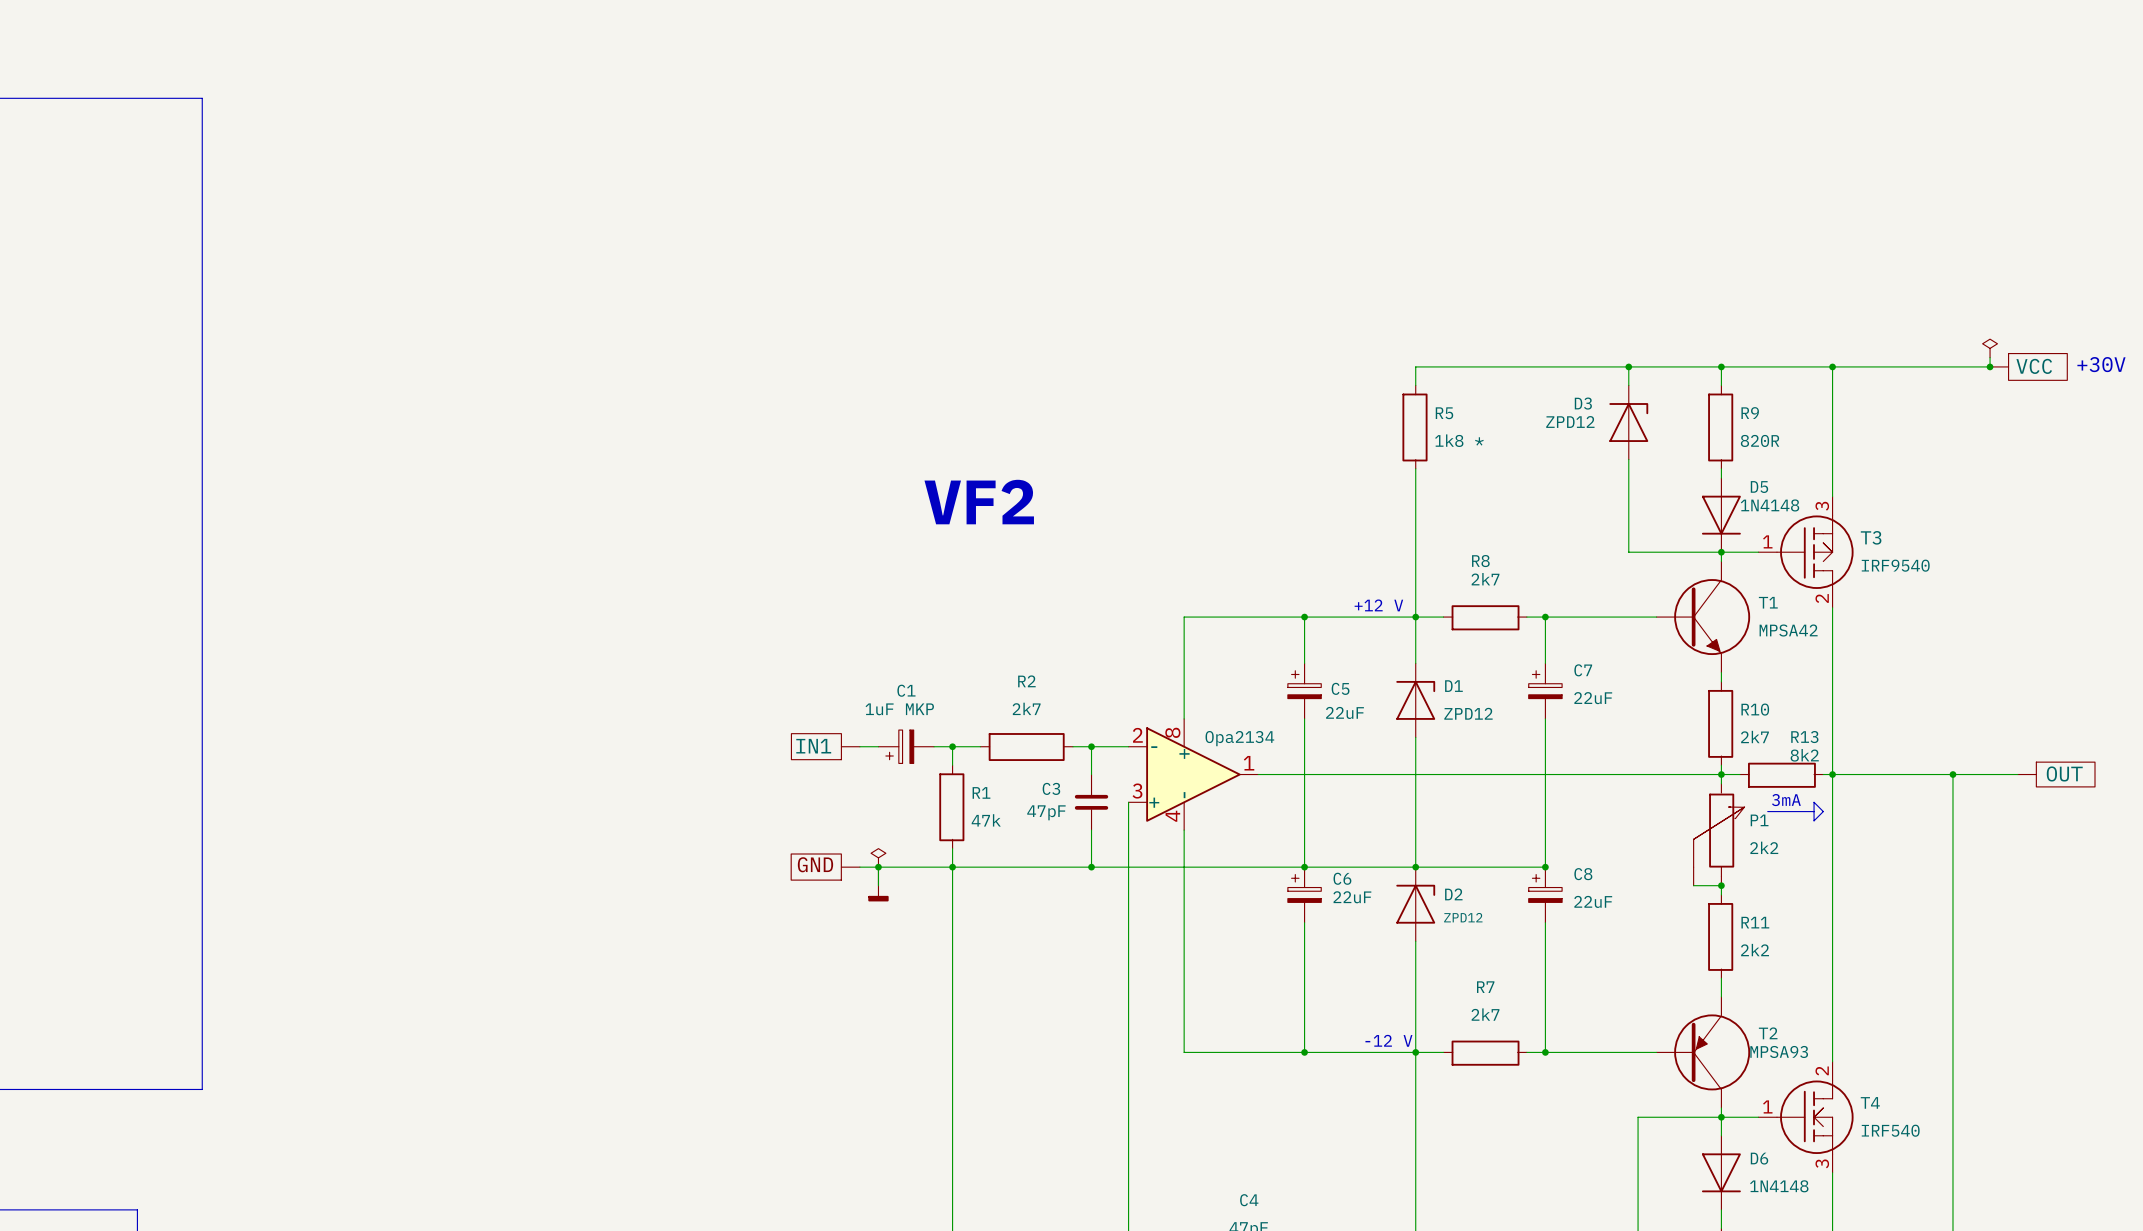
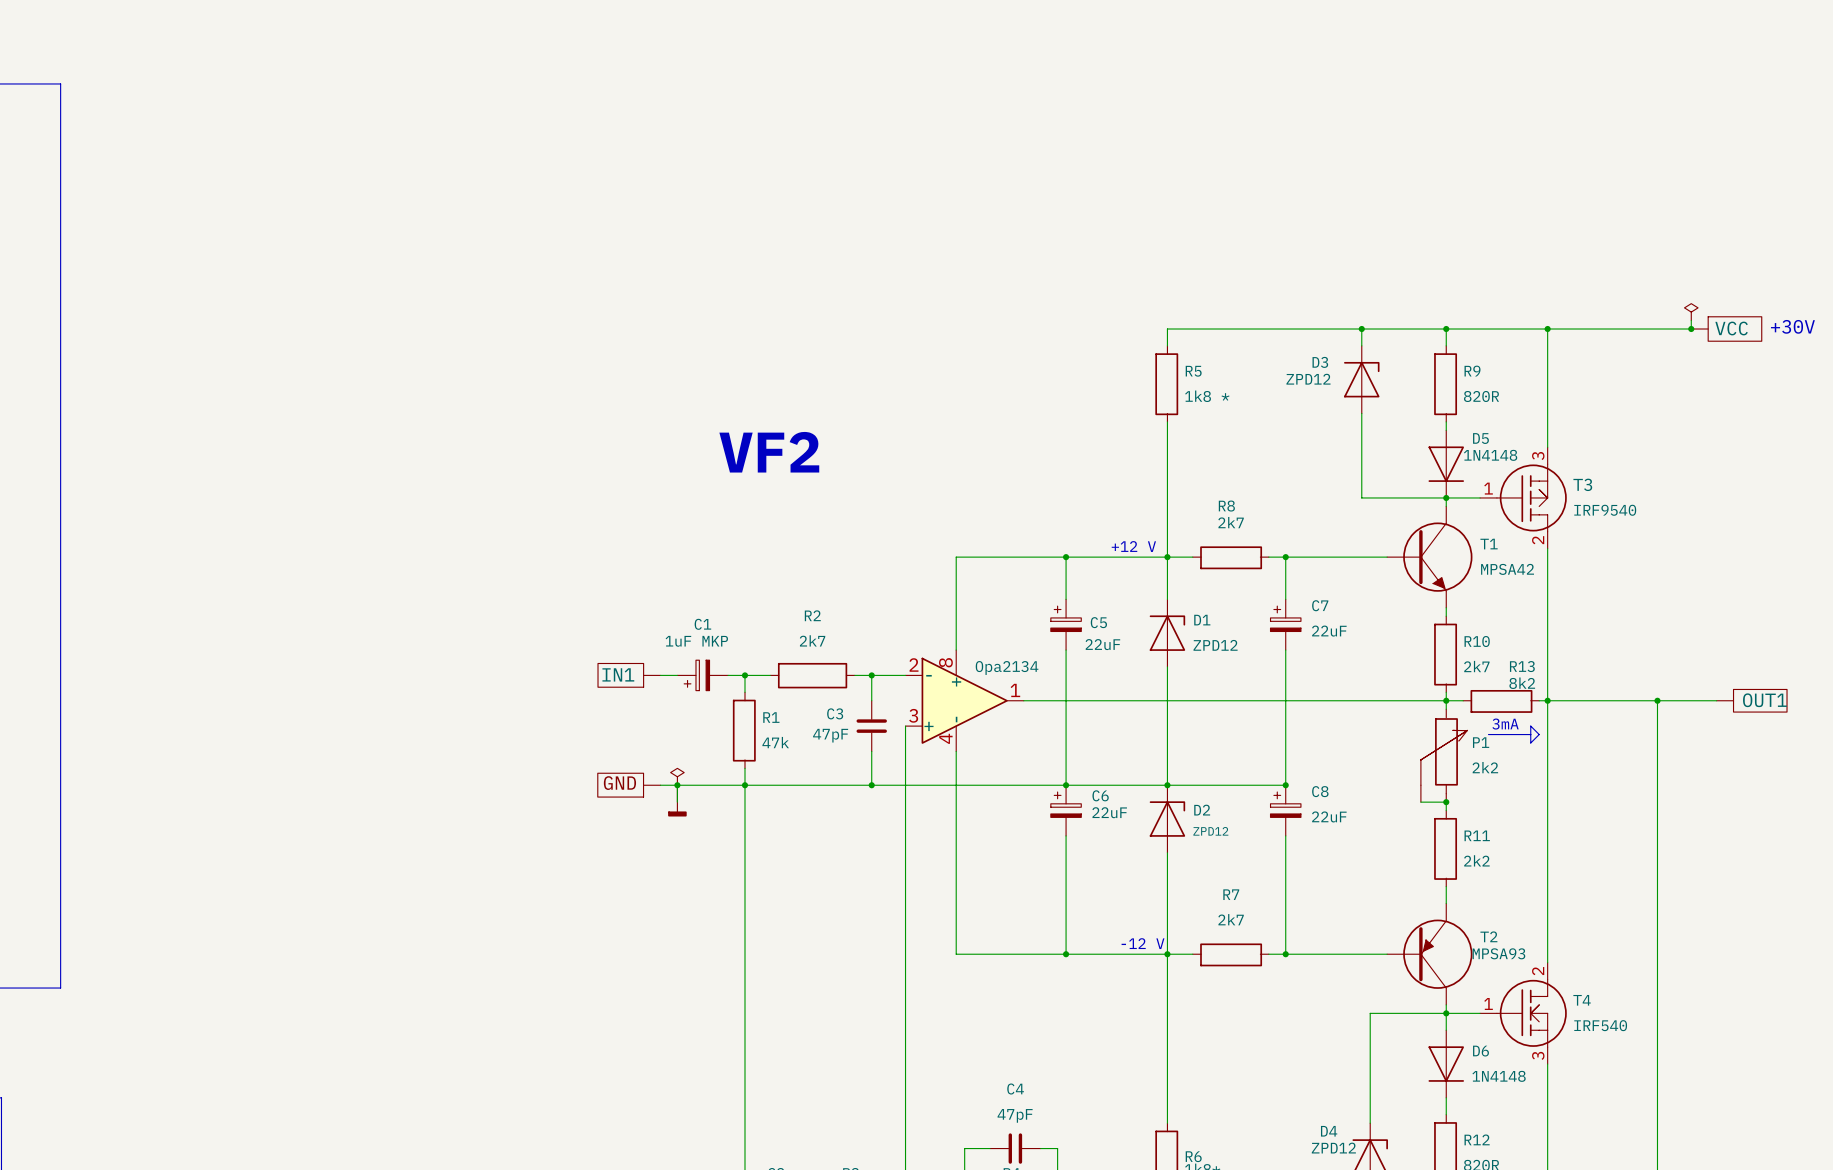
OUT name: OUT (2064, 773) -> OUT1 (1764, 700)

